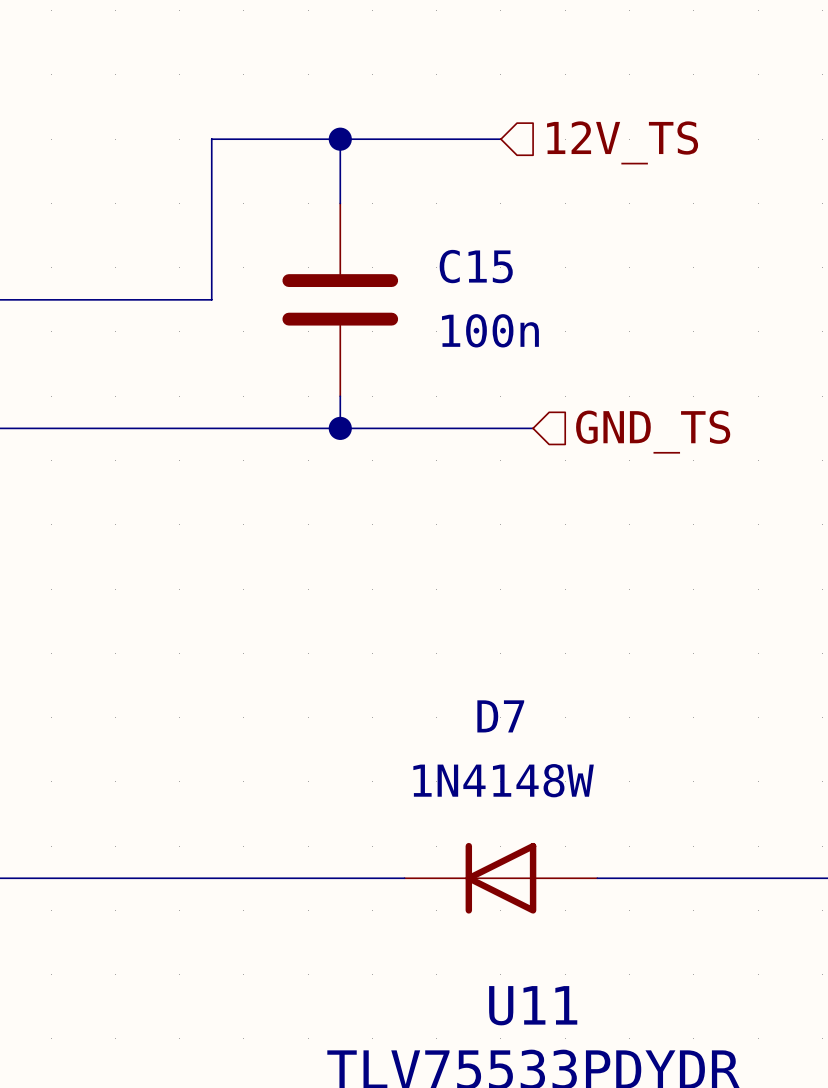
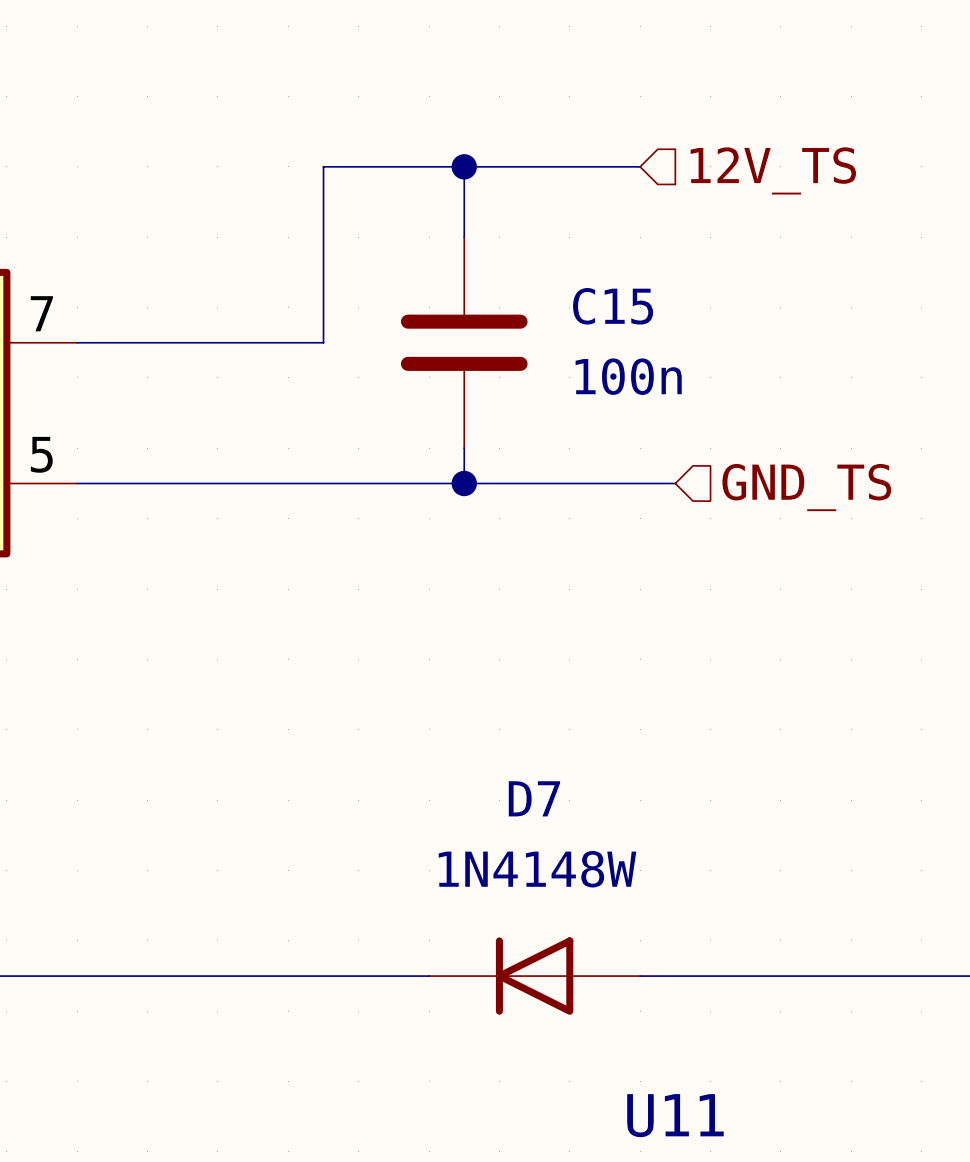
D7 position: (500, 878) -> (534, 976)

